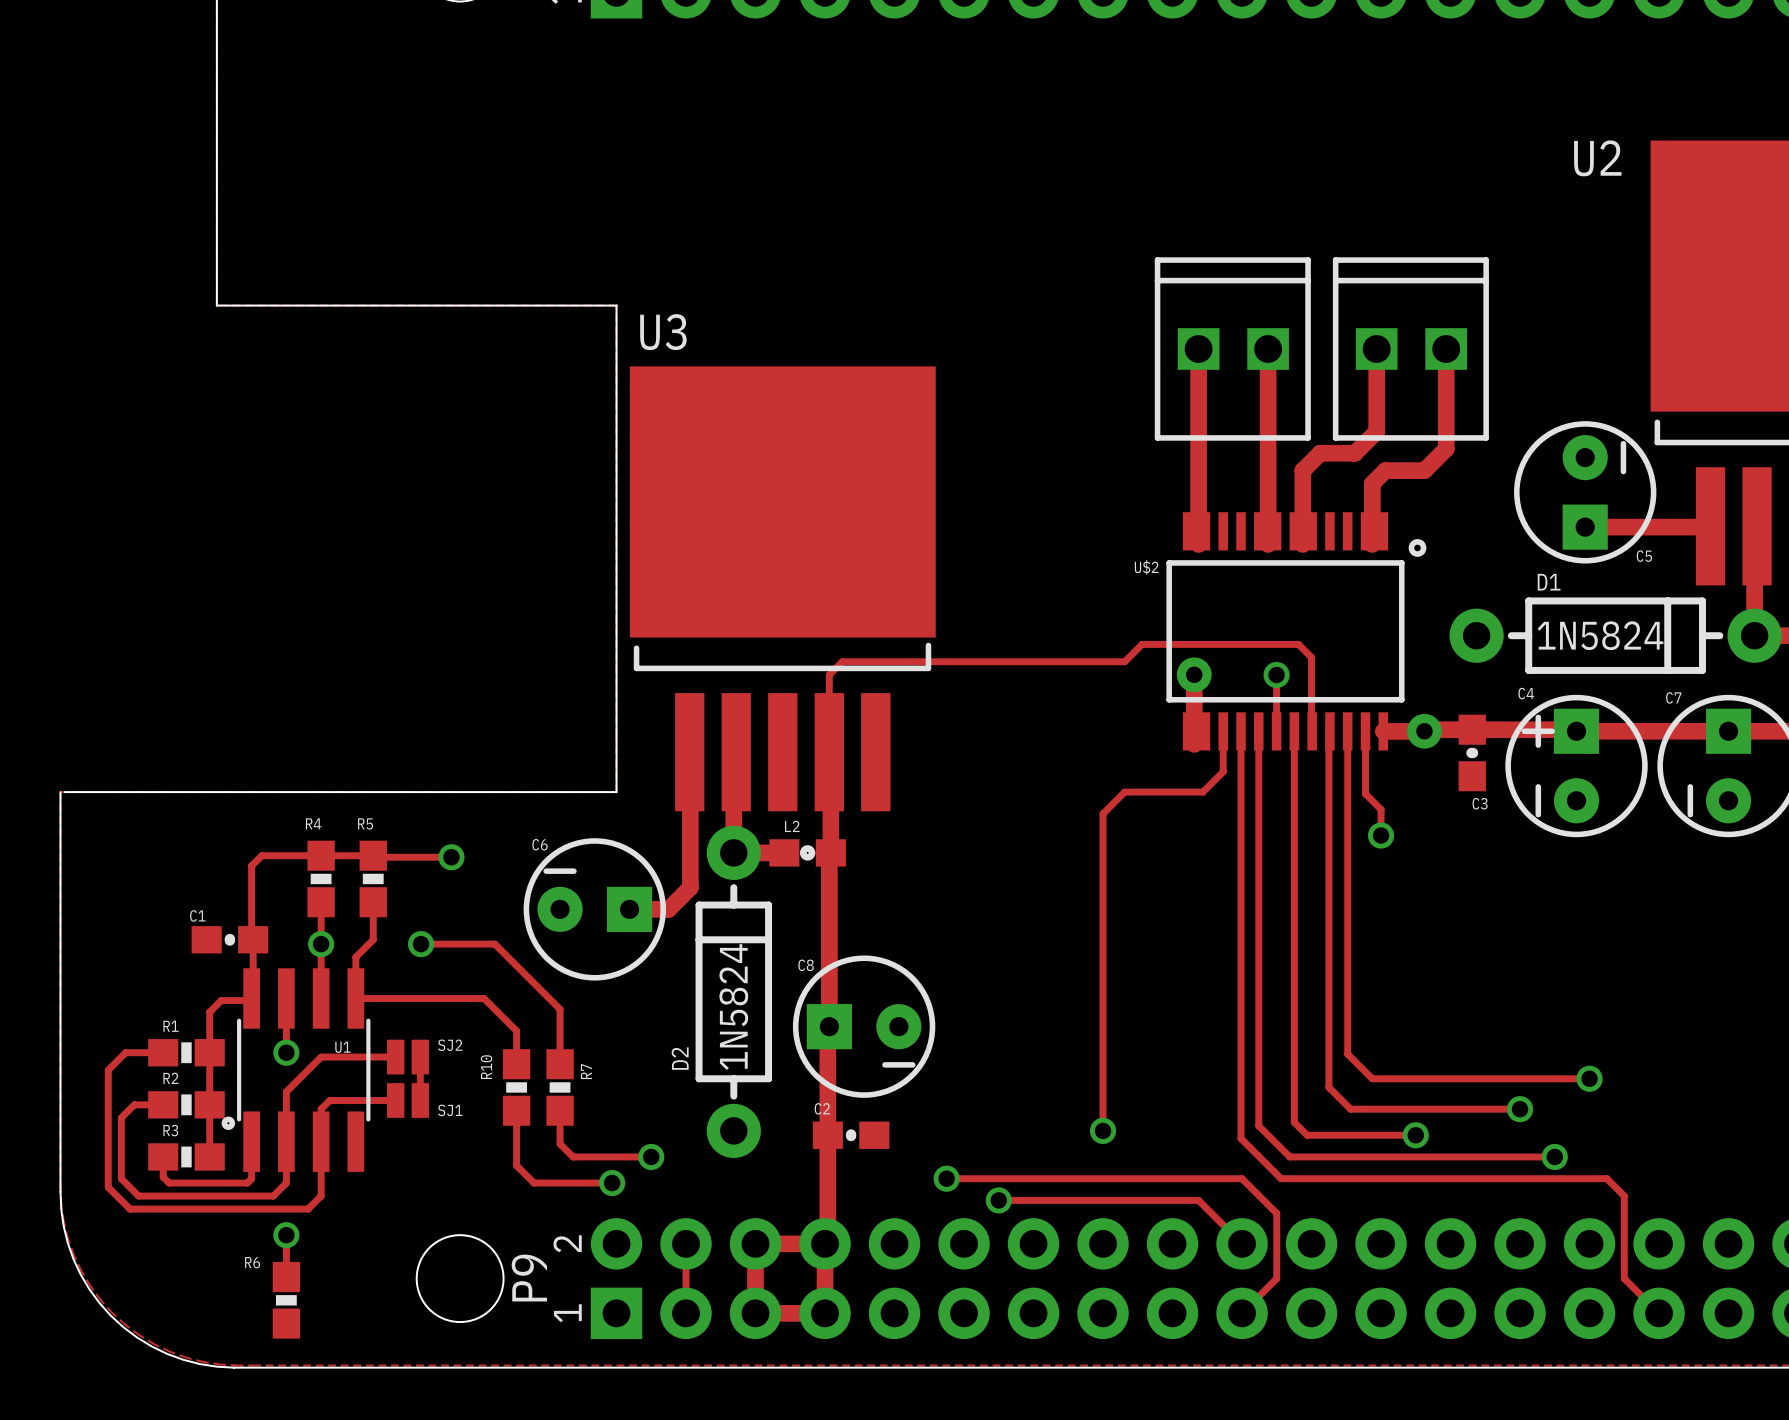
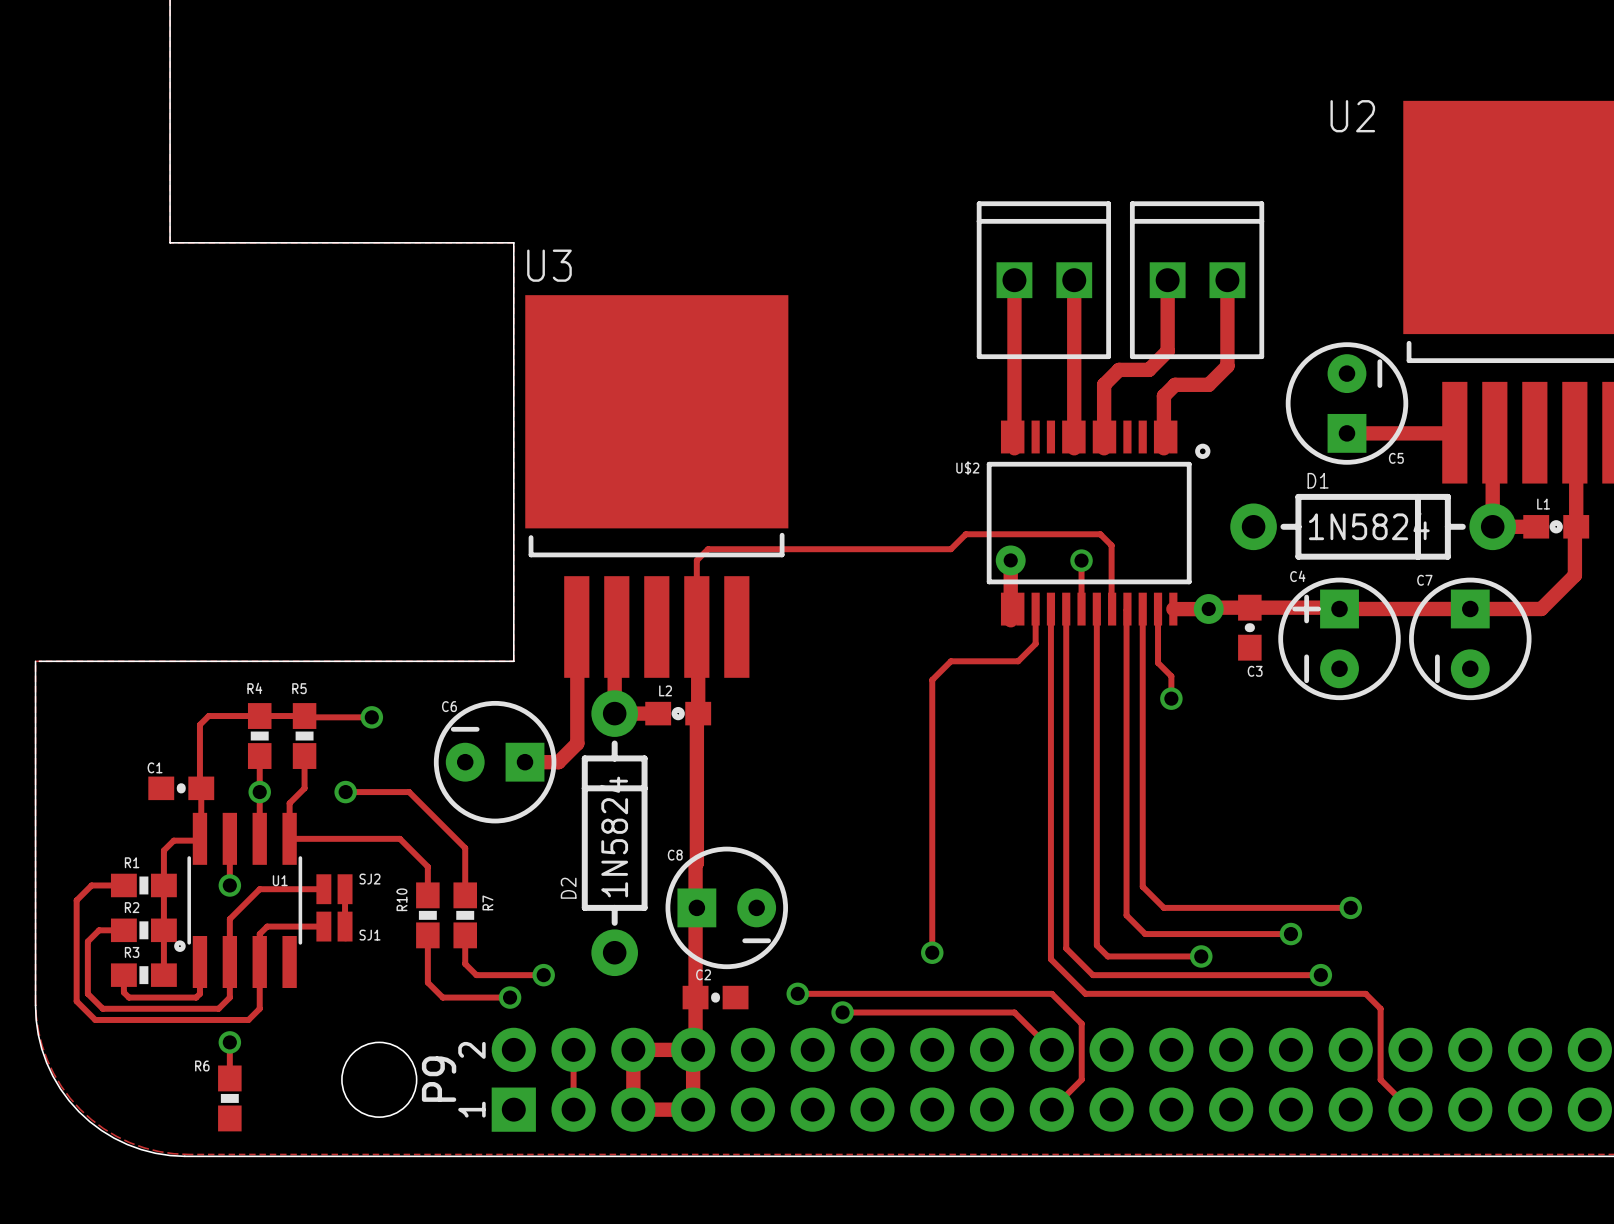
C8 position: (864, 1026) -> (726, 907)
C2 name position: C2 (822, 1108) -> C2 (703, 974)
C2 position: (851, 1135) -> (715, 997)

